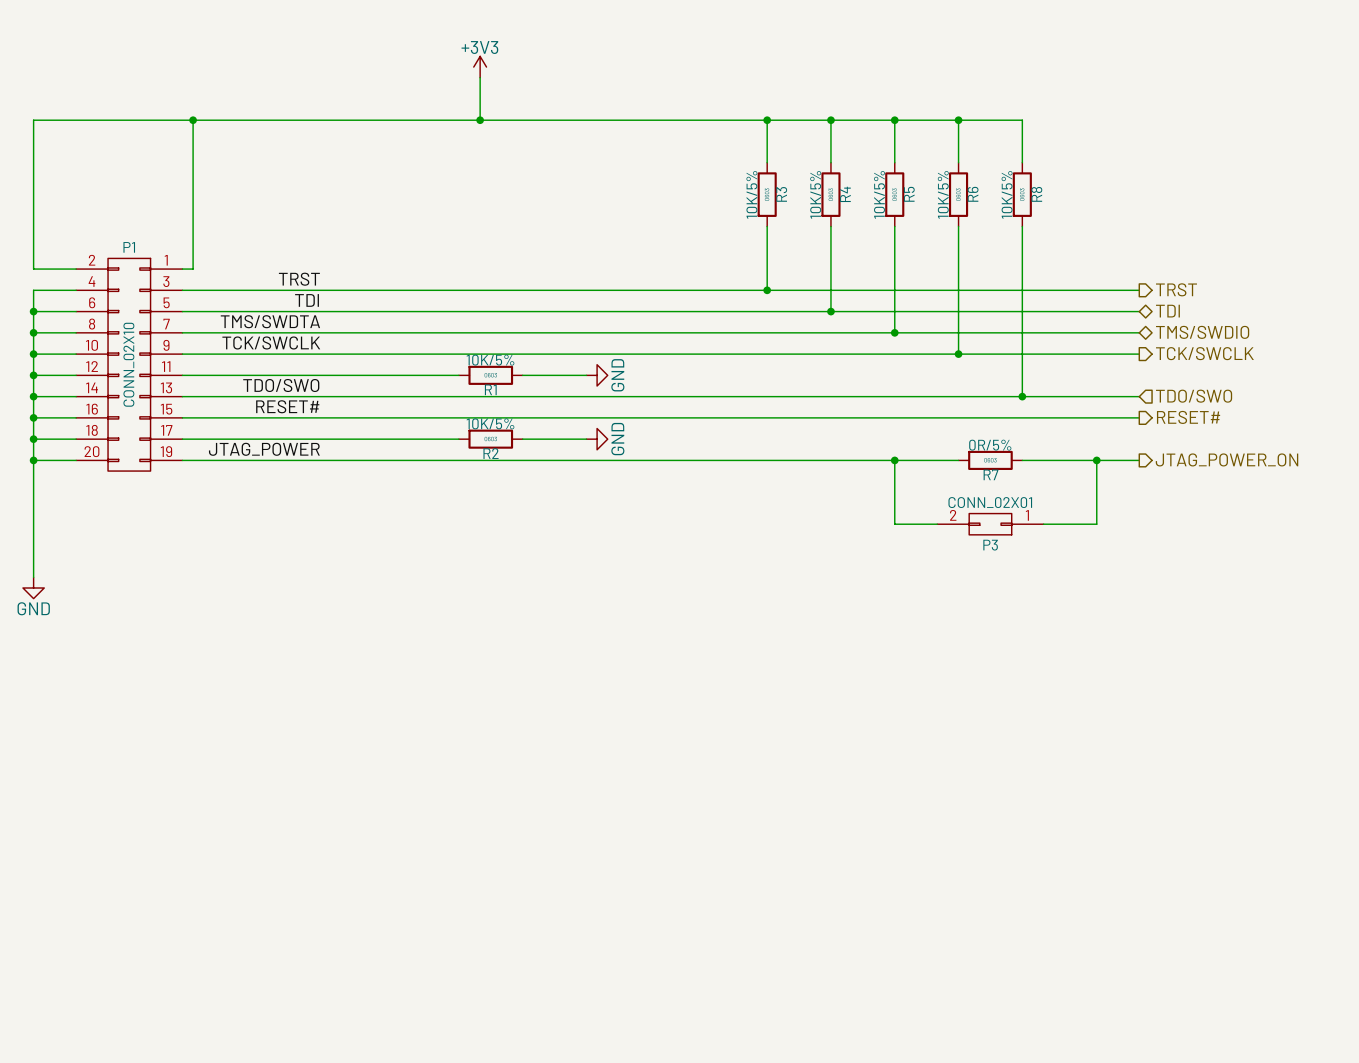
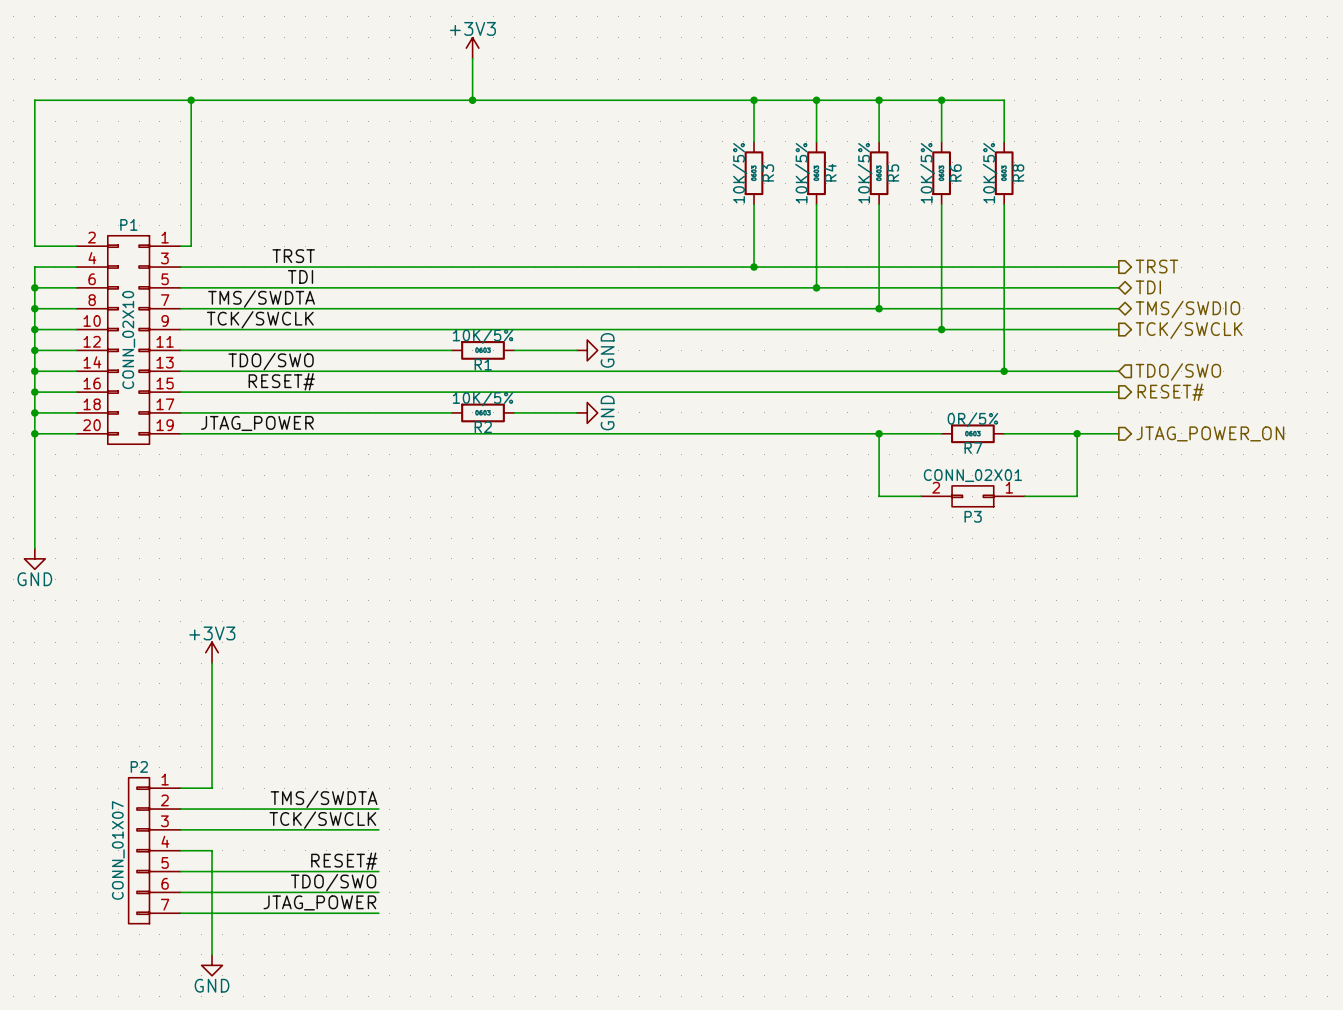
power symbol: none -> +3V3 (212, 652)
wire: none -> (212, 663) (212, 788) (180, 788)
label: none -> TMS/SWDTA (324, 799)
wire: none -> (180, 809) (378, 809)
label: none -> TCK/SWCLK (322, 820)
wire: none -> (180, 829) (378, 829)
P2: none -> CONN_01X07 (154, 850)
wire: none -> (180, 850) (212, 850) (212, 954)
label: none -> RESET# (344, 861)
wire: none -> (180, 871) (378, 871)
label: none -> TDO/SWO (333, 882)
wire: none -> (180, 892) (378, 892)
label: none -> JTAG_POWER (319, 902)
wire: none -> (180, 913) (378, 913)
power symbol: none -> GND (212, 965)

